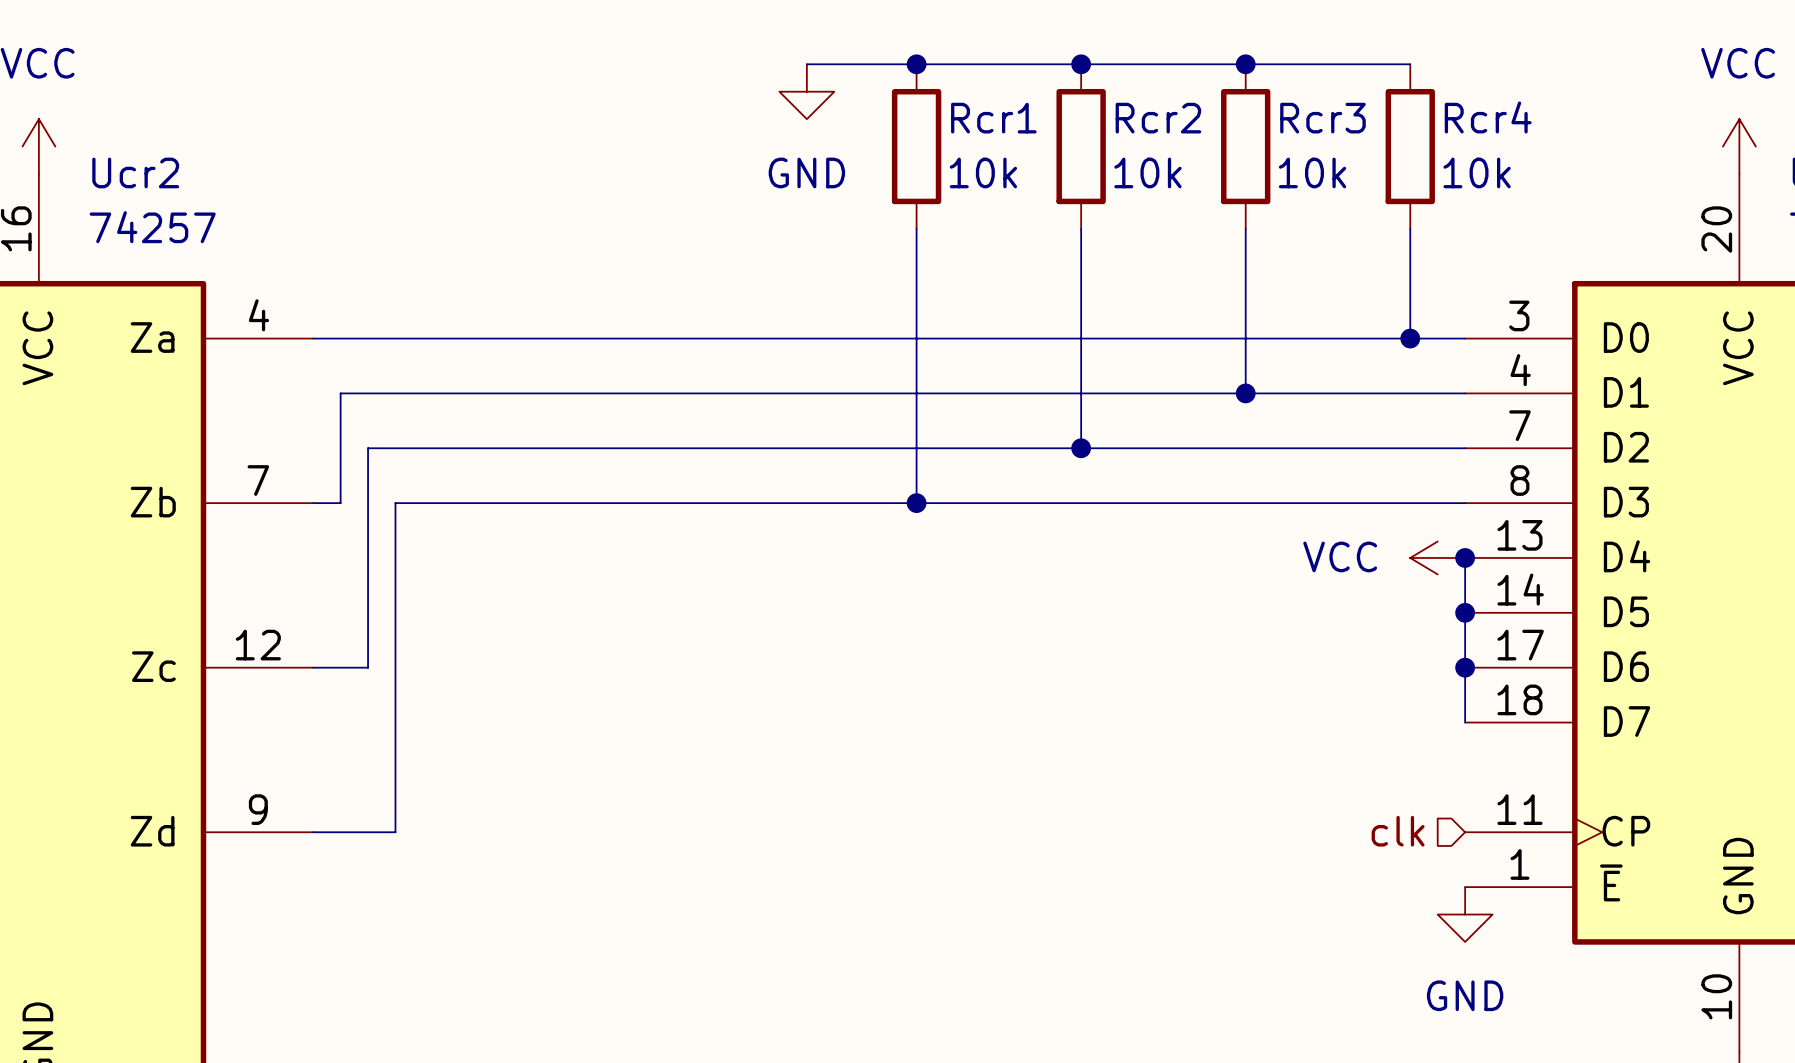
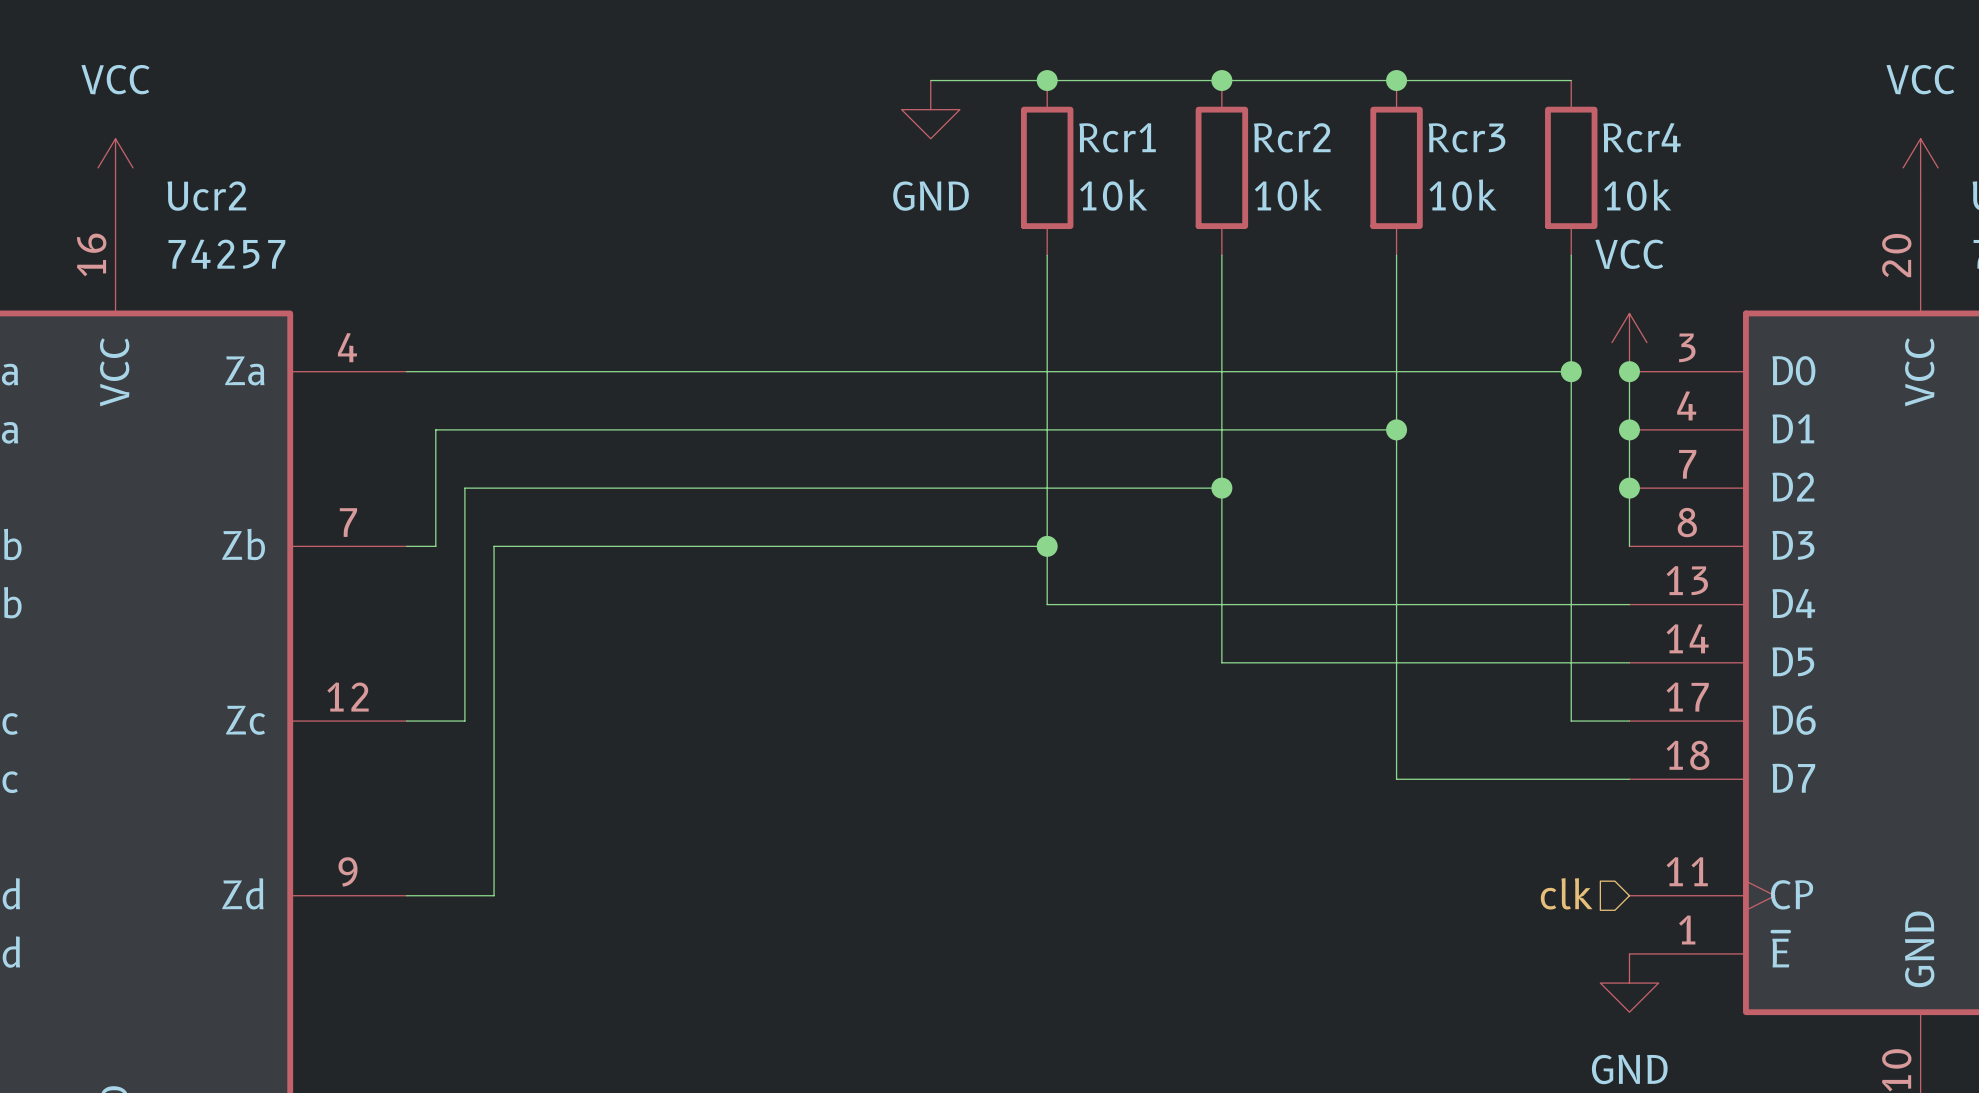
wire: (1410, 338) (1465, 338) -> (1629, 546) (1629, 371)
wire: none -> (1571, 371) (1571, 721) (1629, 721)
junction: none -> (1629, 371)
wire: (1245, 393) (1465, 393) -> none
junction: none -> (1629, 429)
wire: (1081, 448) (1465, 448) -> (1221, 488) (1221, 662) (1629, 662)
junction: none -> (1629, 488)
wire: (916, 503) (1465, 503) -> (1047, 546) (1047, 604) (1629, 604)
power symbol rotation: 0° (1437, 557) -> 90° clockwise (1629, 342)
power symbol position: VCC (1437, 557) -> VCC (1629, 342)
wire: (1465, 557) (1465, 722) -> (1396, 429) (1396, 779) (1629, 779)
junction: (1465, 557) -> none
junction: (1465, 612) -> none
junction: (1465, 667) -> none

